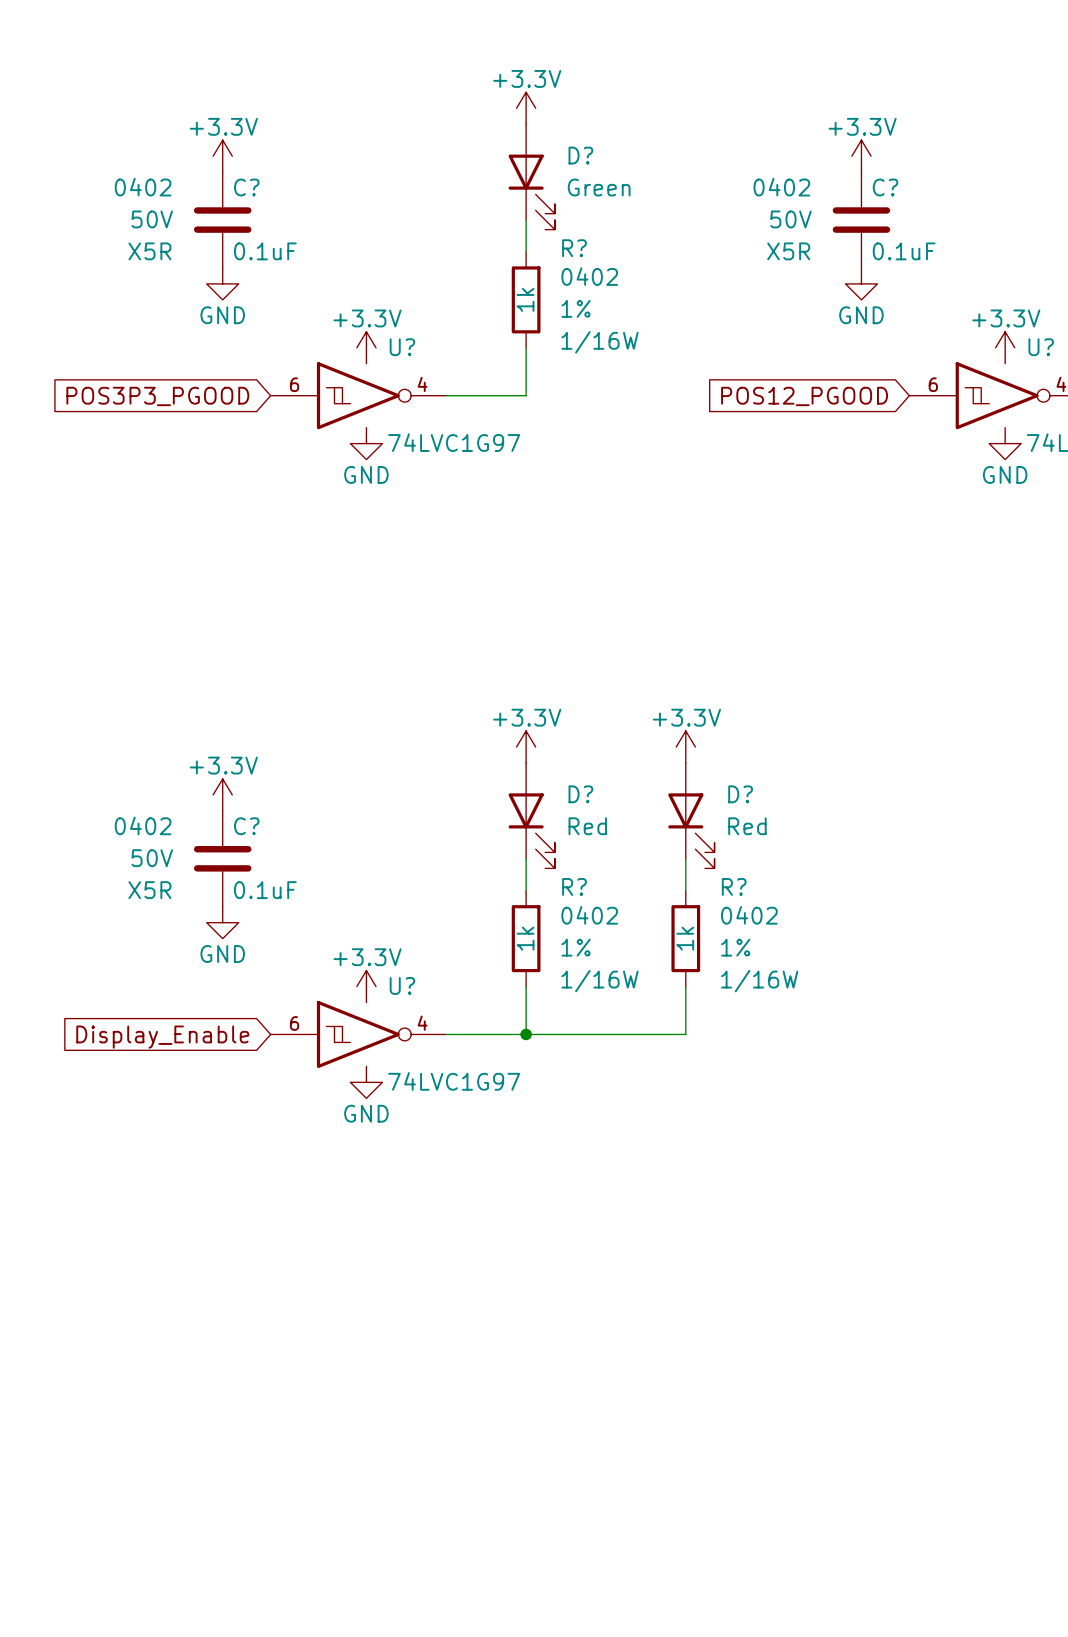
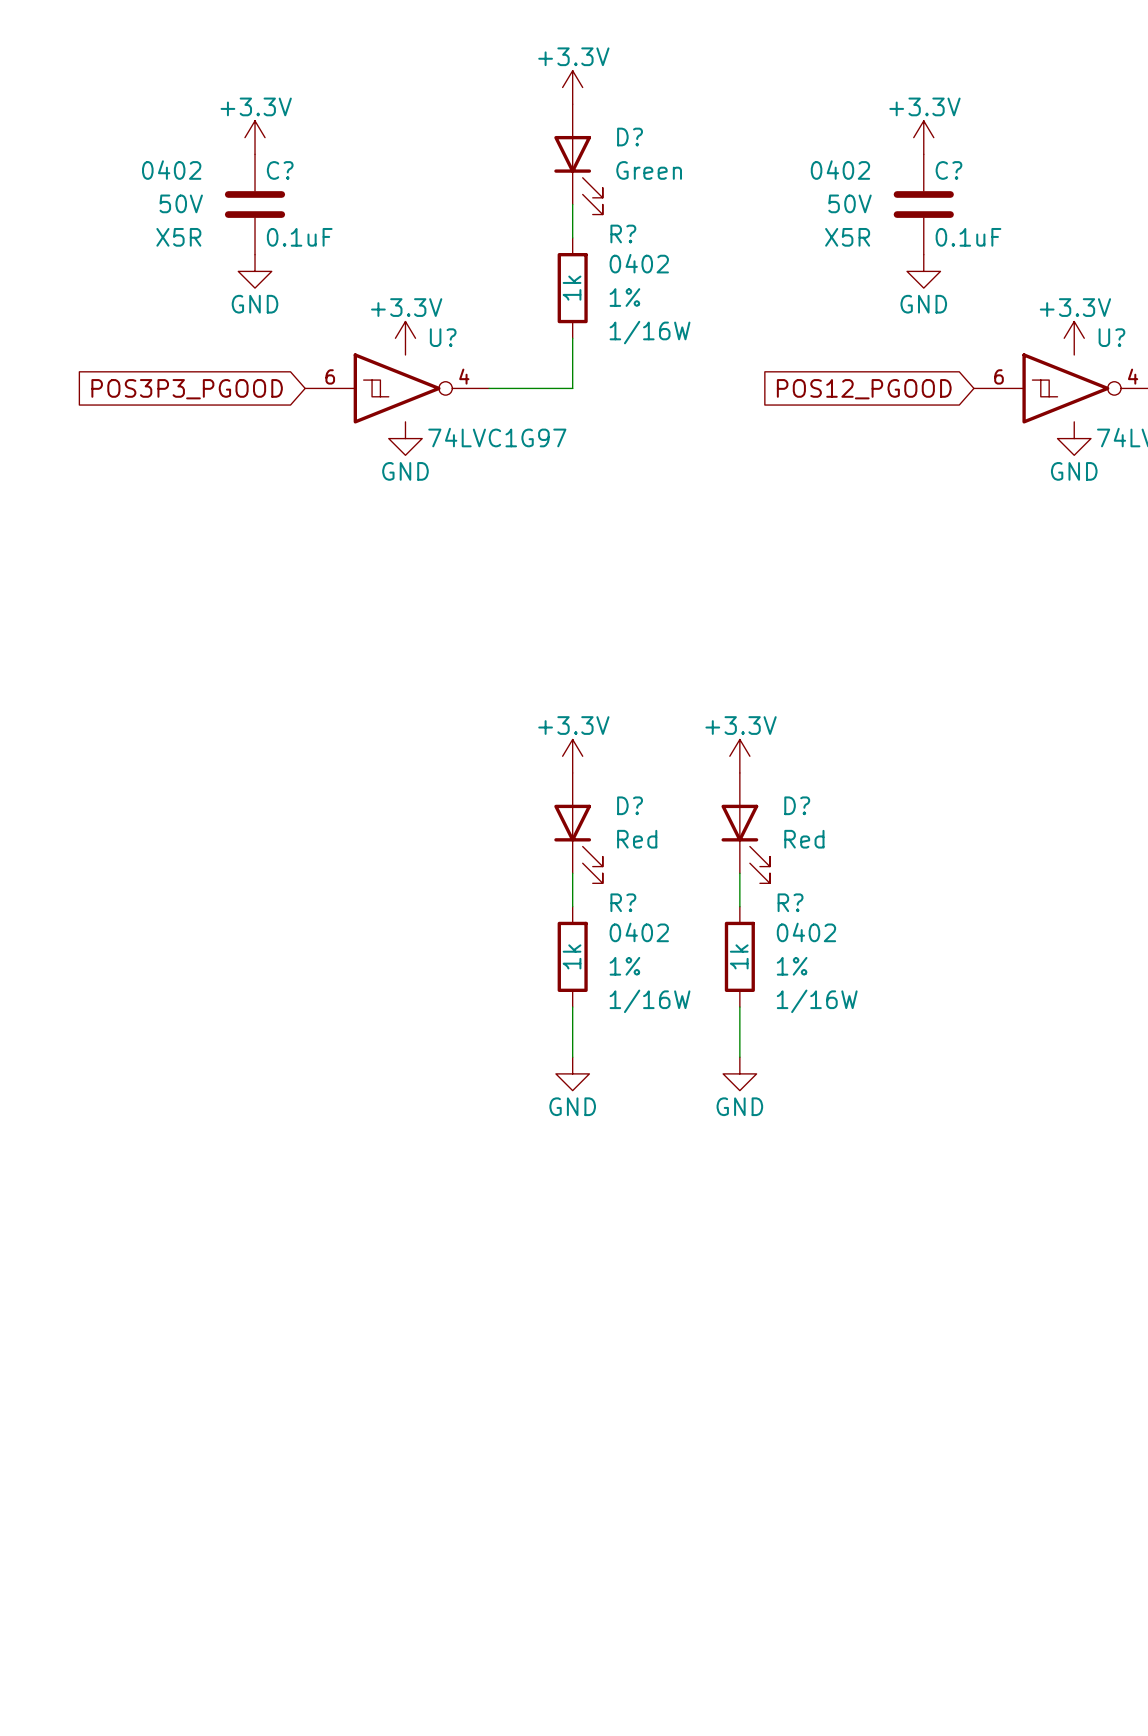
power symbol: +3.3V (222, 794) -> none
C?: 0.1uF (222, 858) -> none
power symbol: GND (222, 922) -> none
power symbol: +3.3V (366, 986) -> none
U?: 74LVC1G97 (358, 1034) -> none
wire: (446, 1034) (685, 1034) -> none
junction: (526, 1034) -> none
global label: Display_Enable (162, 1037) -> none
power symbol: none -> GND (572, 1073)
power symbol: none -> GND (739, 1073)
power symbol: GND (366, 1082) -> none

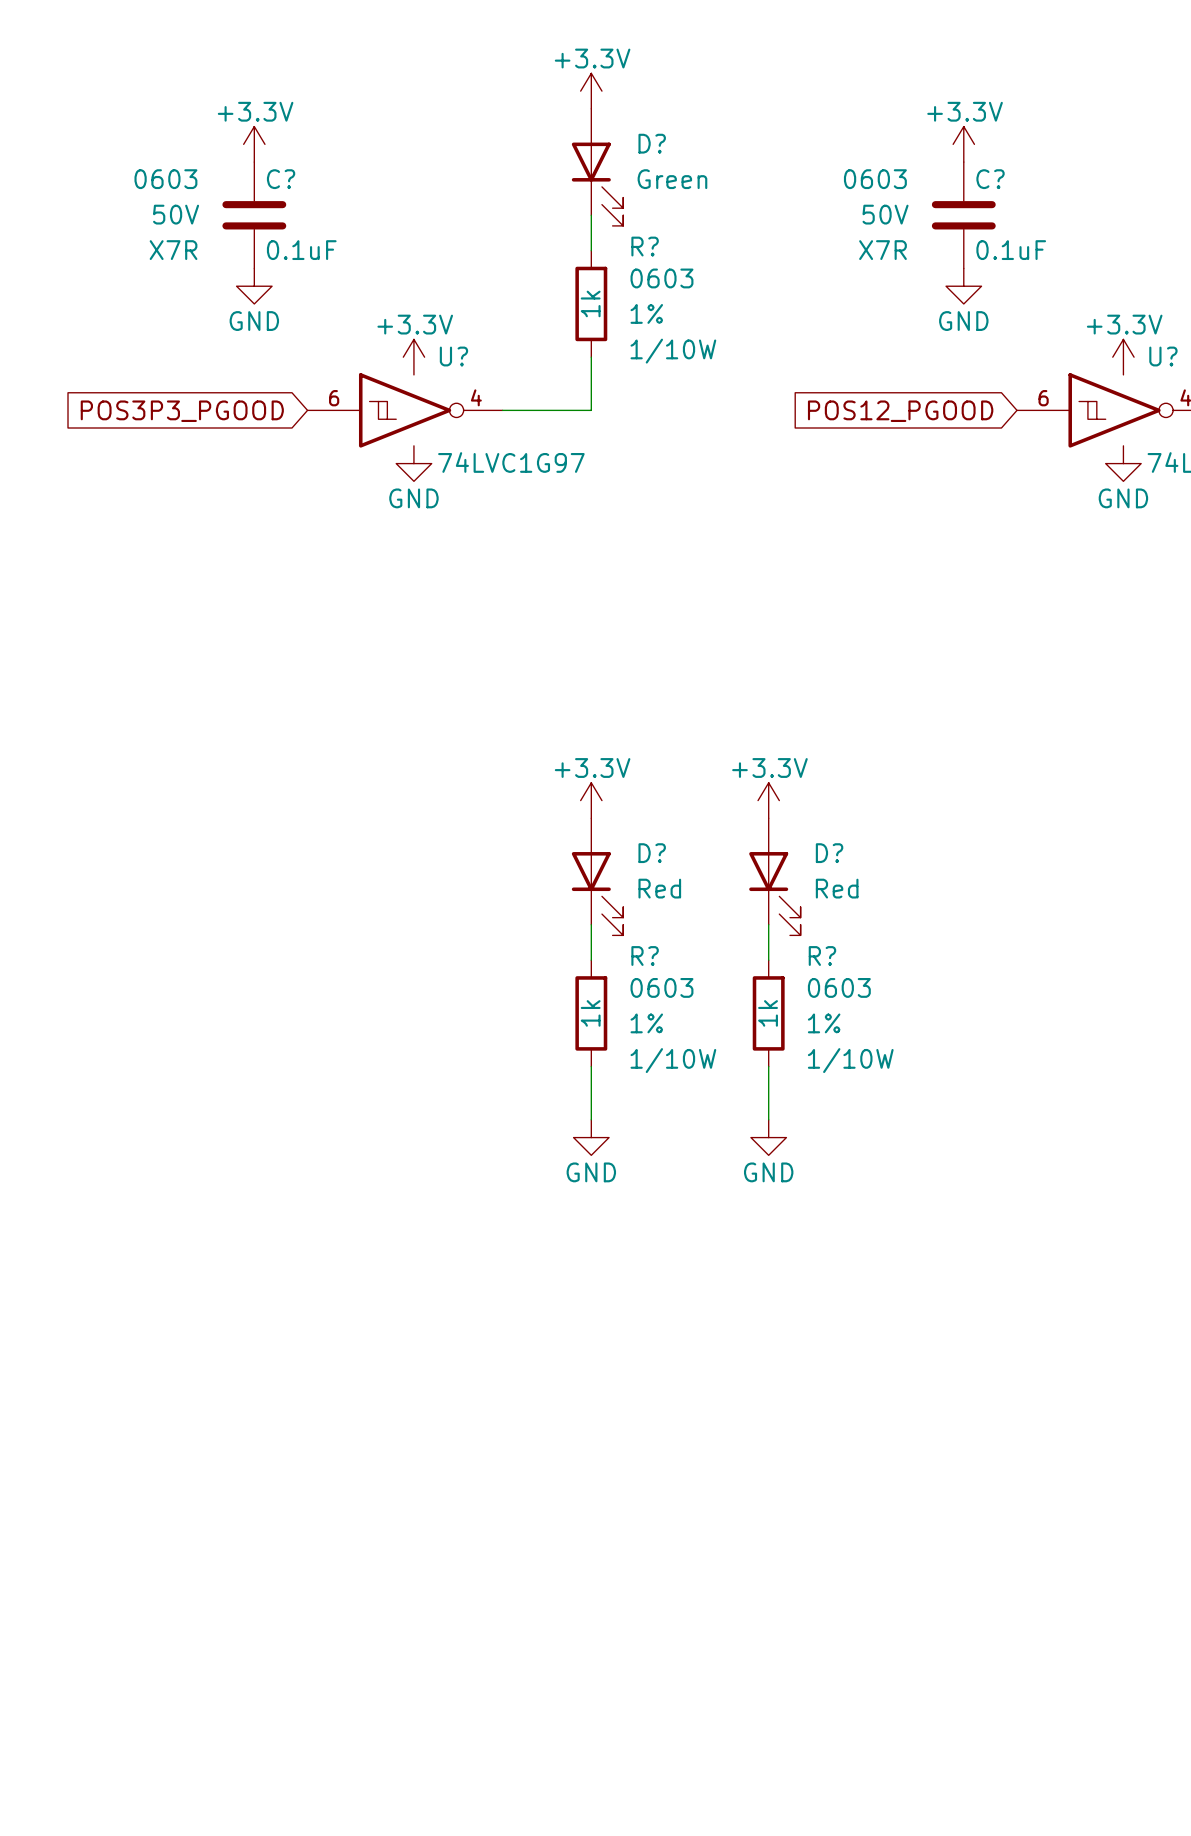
C? text: 0402 (171, 170) -> 0603 (165, 179)
C? text: 0402 (840, 170) -> 0603 (875, 179)
C? text: X5R (178, 237) -> X7R (173, 250)
C? text: X5R (847, 237) -> X7R (883, 250)
R? text: 0402 (639, 263) -> 0603 (661, 278)
R? text: 1/16W (650, 332) -> 1/10W (673, 351)
R? text: 0402 (639, 932) -> 0603 (661, 987)
R? text: 0402 (806, 932) -> 0603 (839, 987)
R? text: 1/16W (650, 1001) -> 1/10W (673, 1060)
R? text: 1/16W (817, 1001) -> 1/10W (850, 1060)

